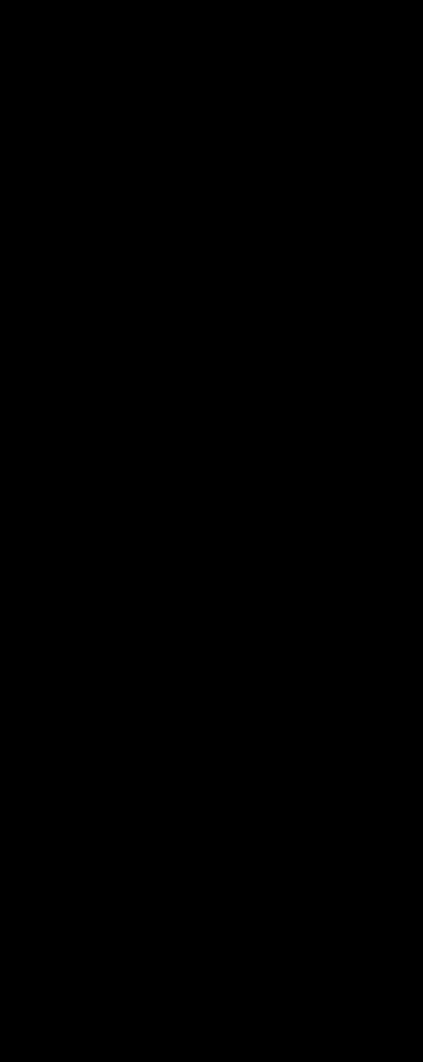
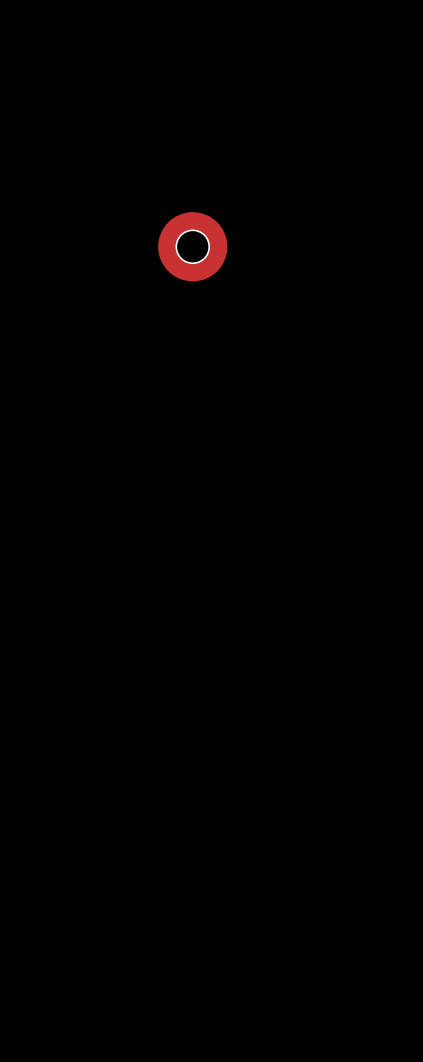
part: none -> (192, 246)

